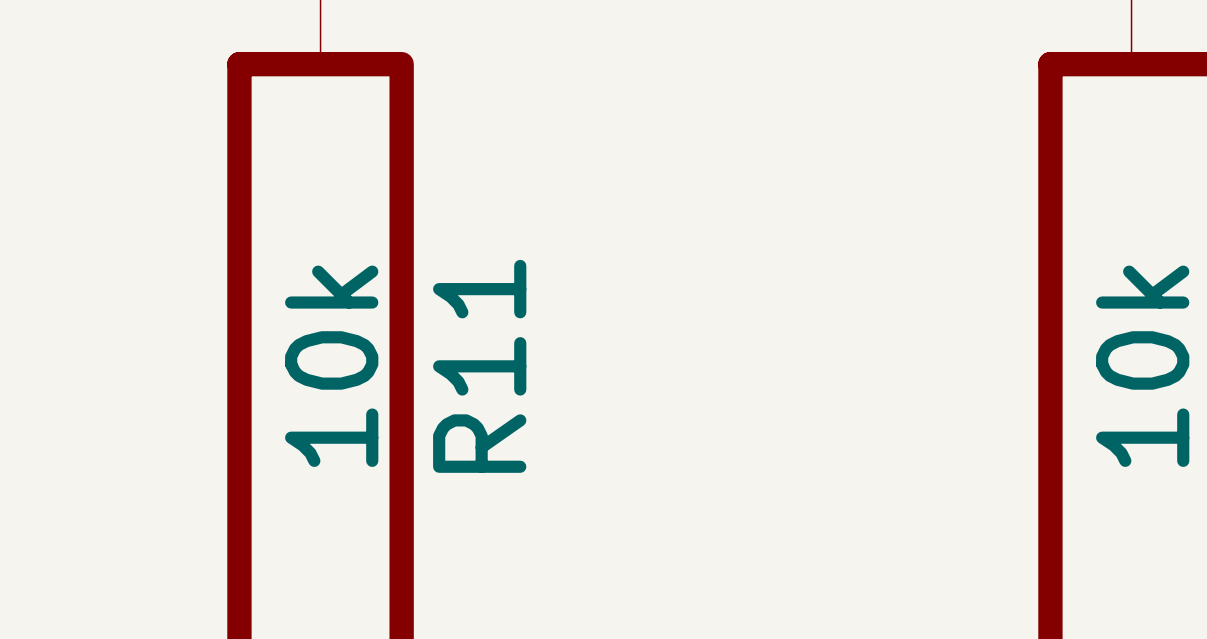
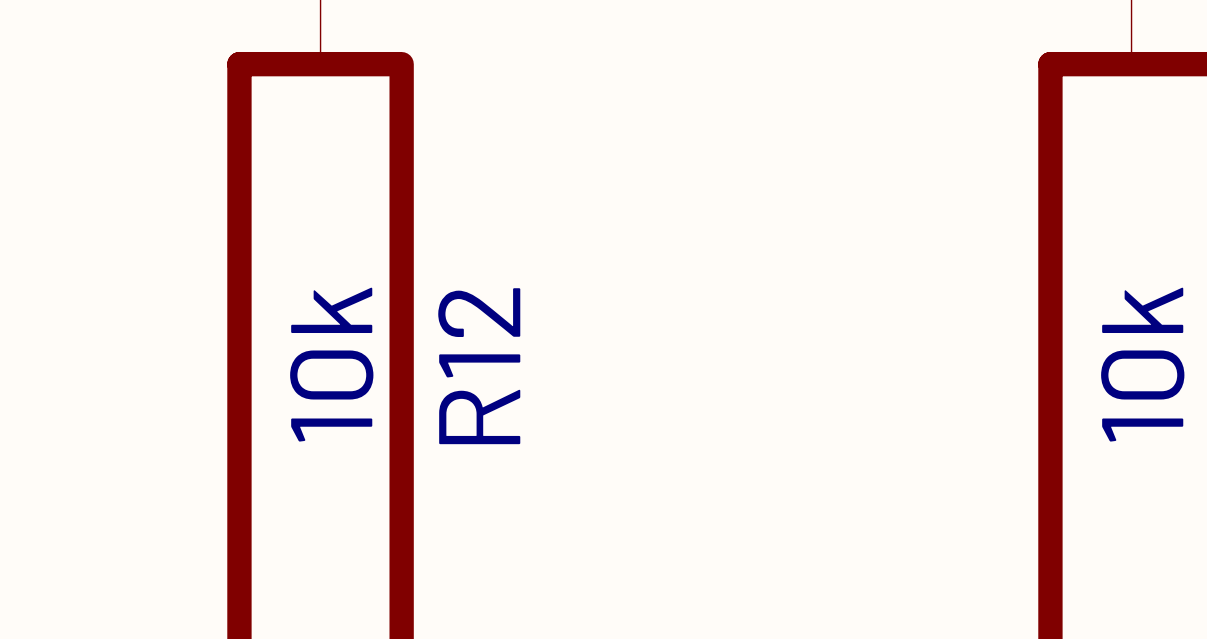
R11 name: R11 (479, 366) -> R12 (479, 366)

